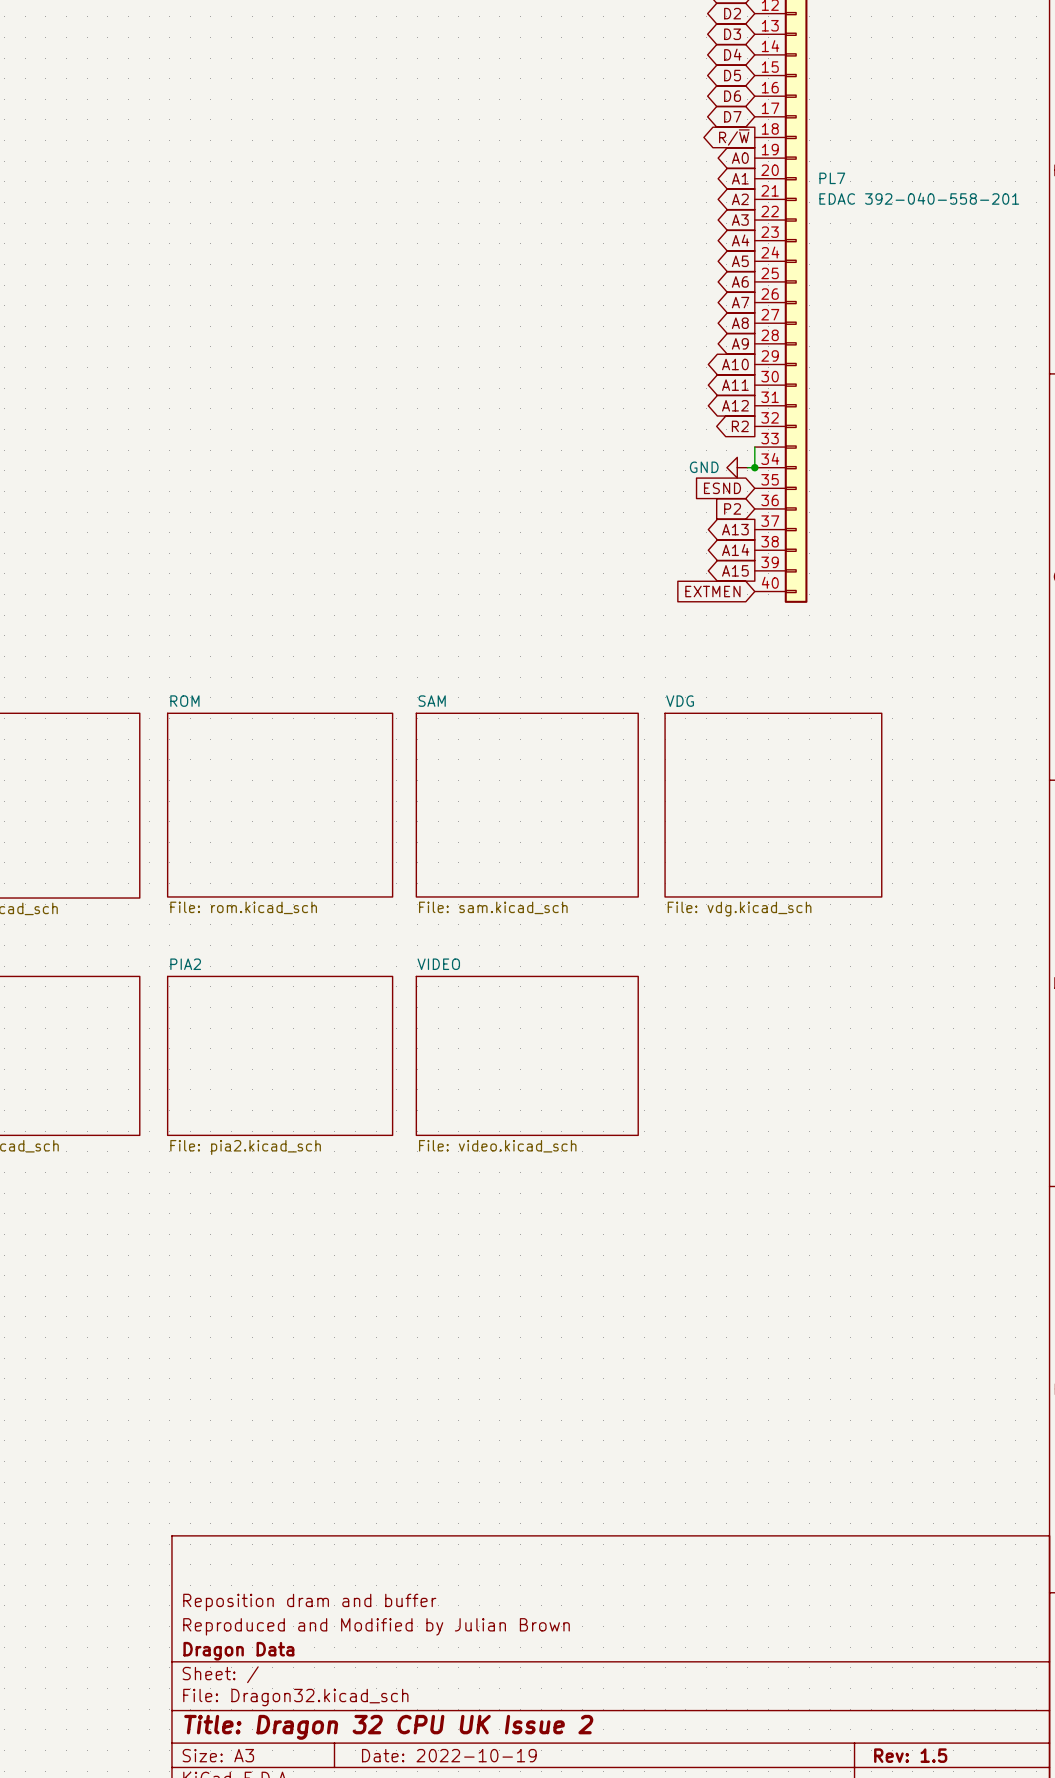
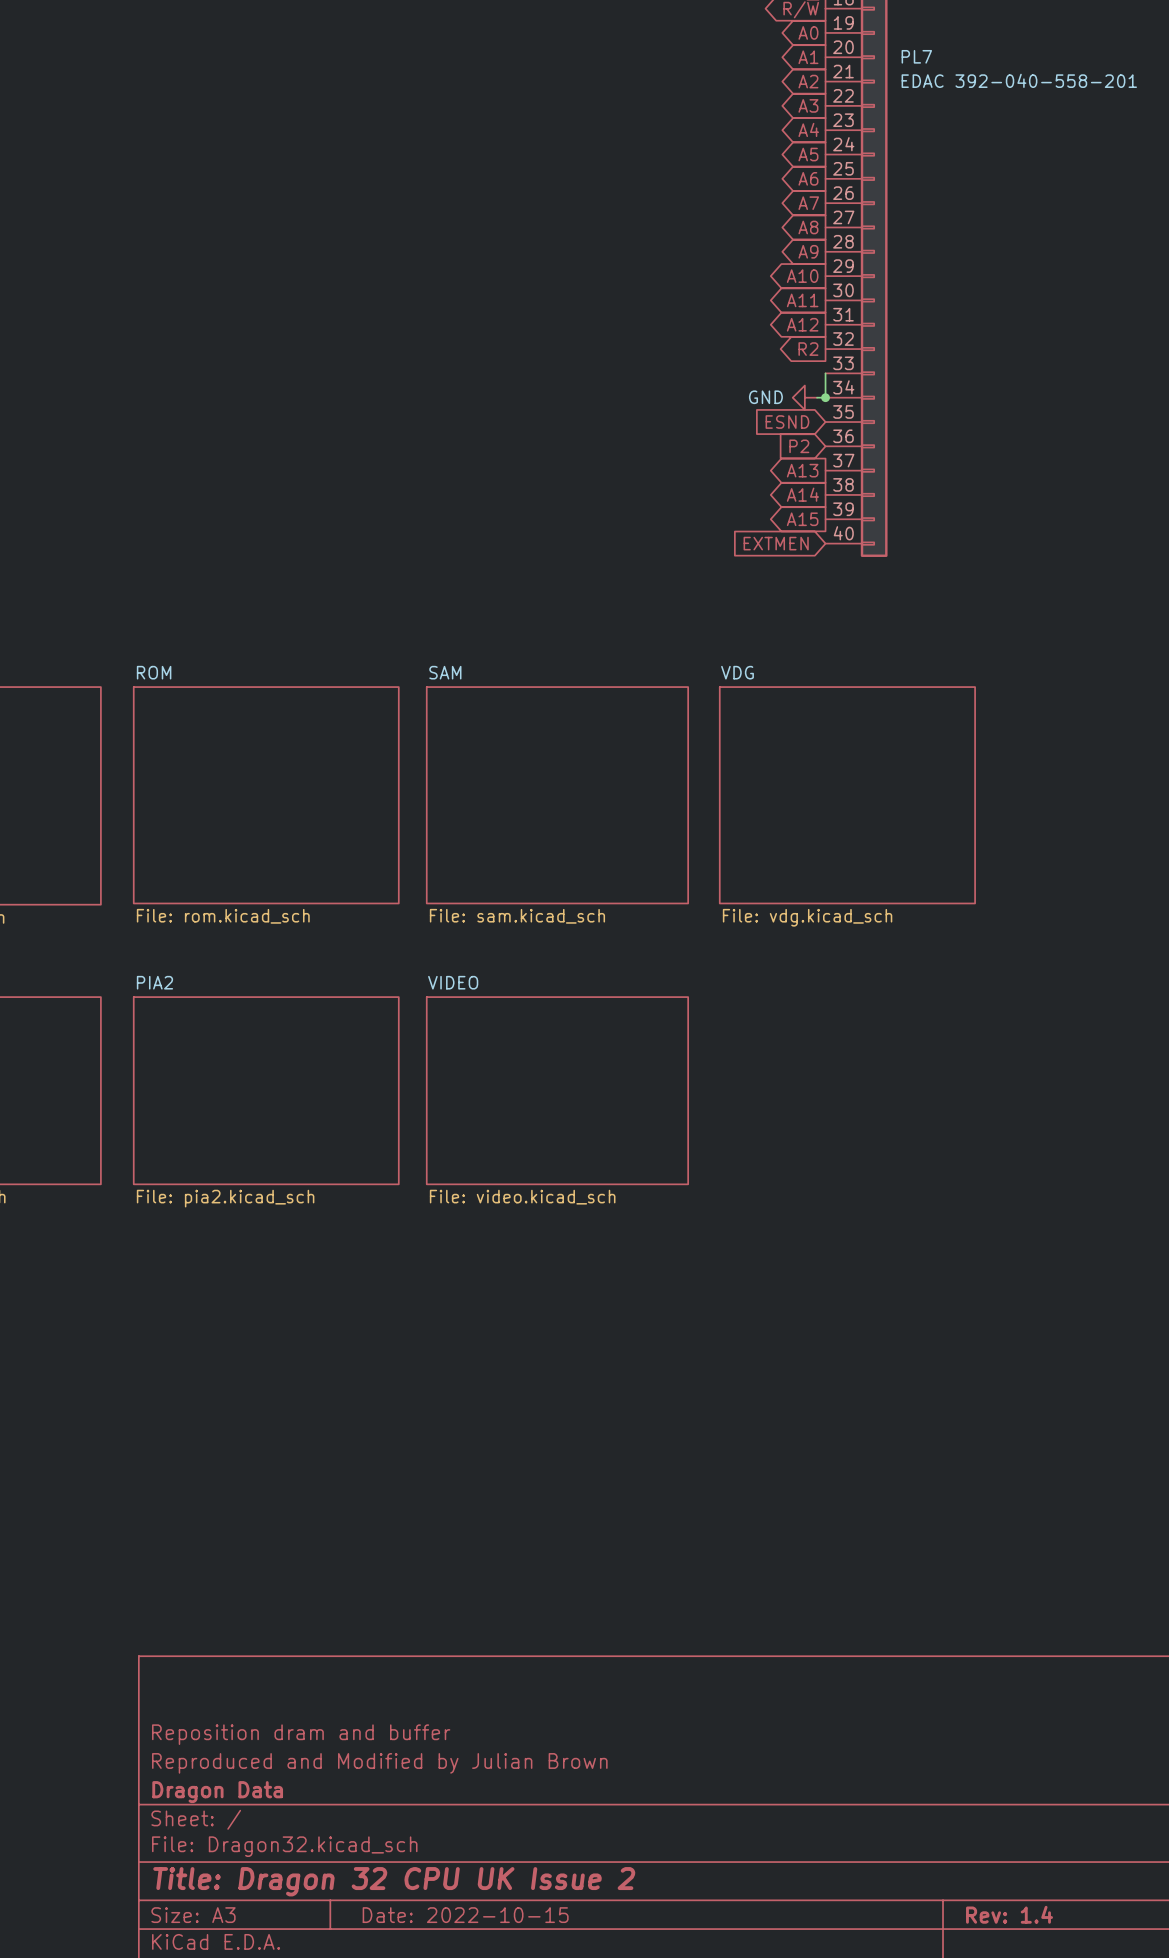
title block: Date: 2022-10-19 (449, 1755) -> Date: 2022-10-15 (465, 1915)
title block: Rev: 1.5 (910, 1755) -> Rev: 1.4 (1009, 1914)

